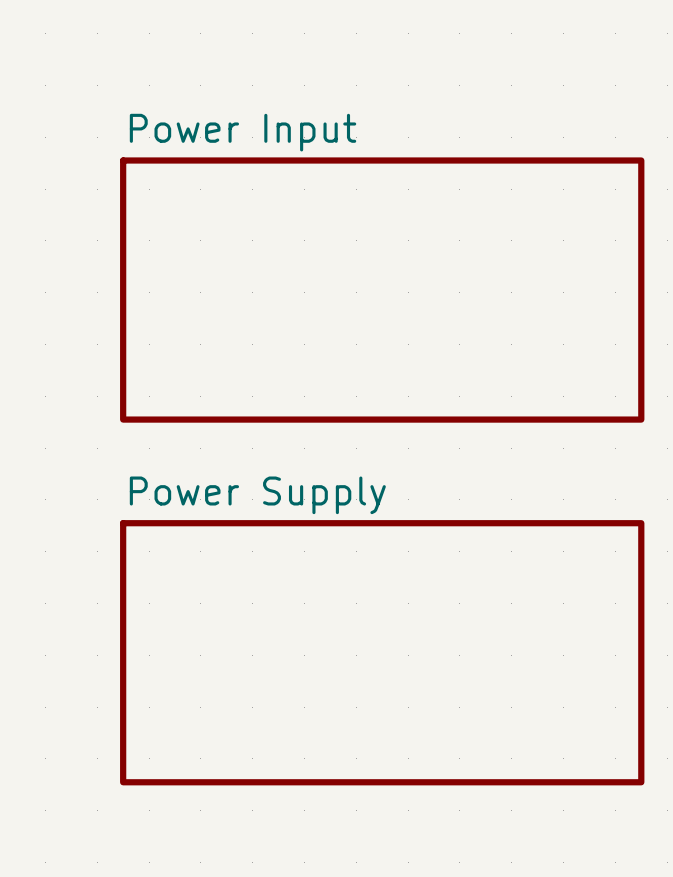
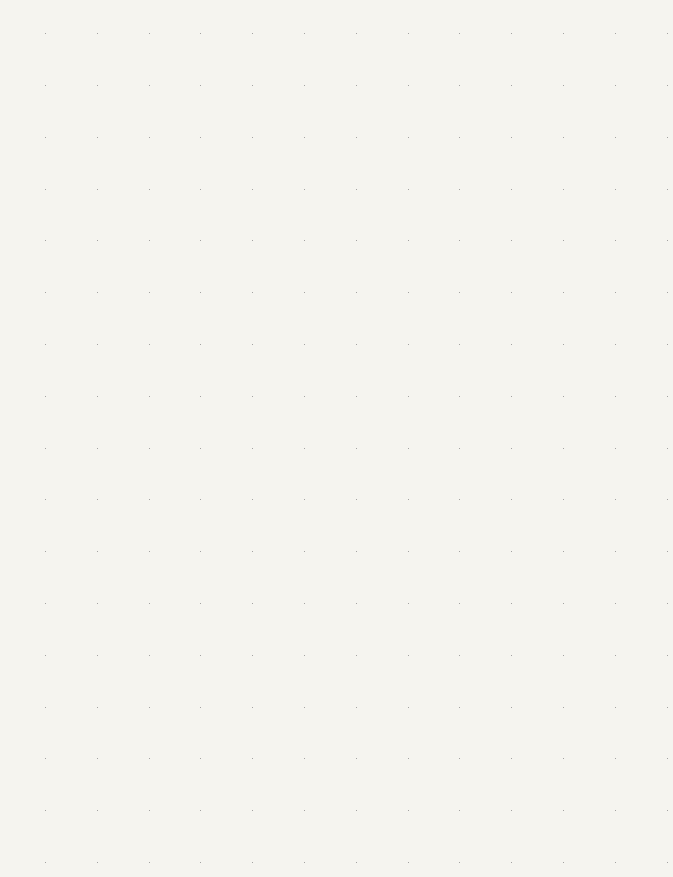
sheet Power Input: (382, 290) -> none
sheet Power Supply: (382, 652) -> none

